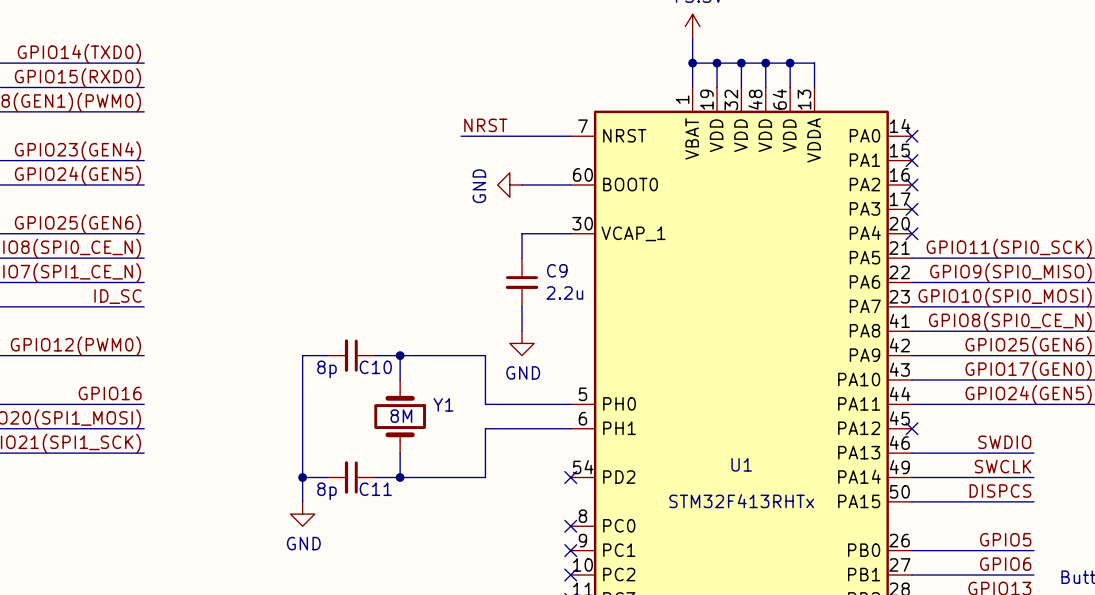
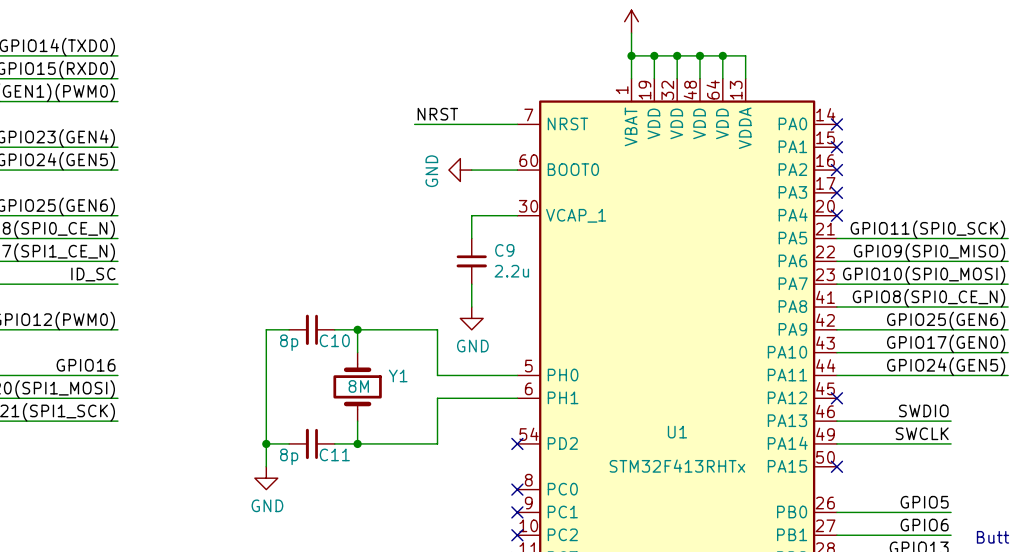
label: DISPCS (1000, 491) -> none
wire: (912, 501) (1033, 501) -> none
no-connect mark: none -> (836, 466)

